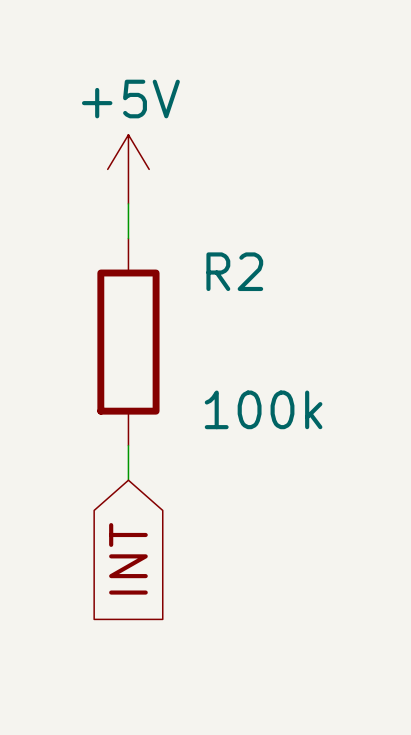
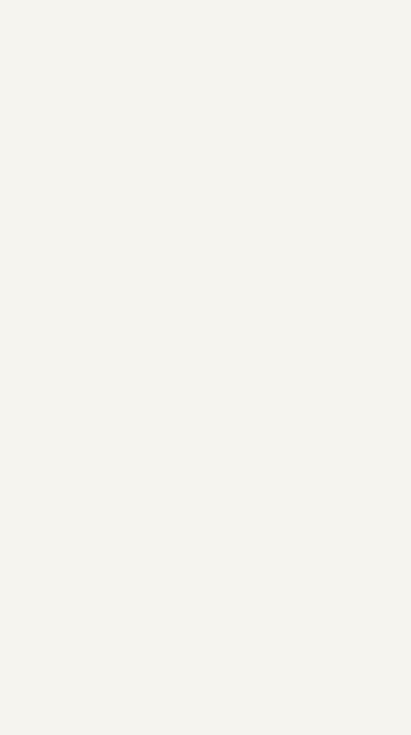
power symbol: +5V (128, 169) -> none
wire: (128, 203) (128, 238) -> none
R2: 100k (128, 342) -> none
wire: (128, 445) (128, 480) -> none
global label: INT (128, 558) -> none

